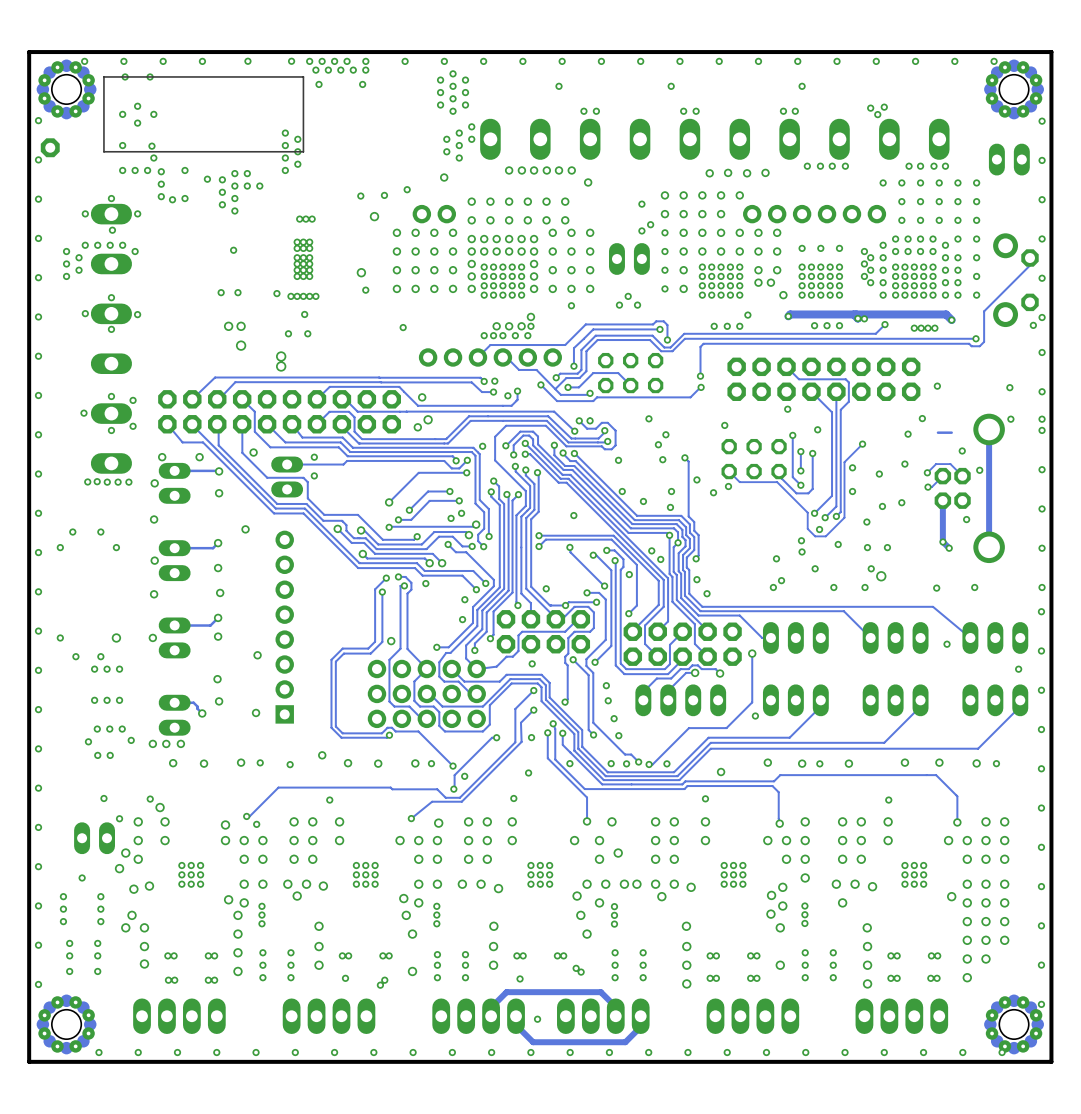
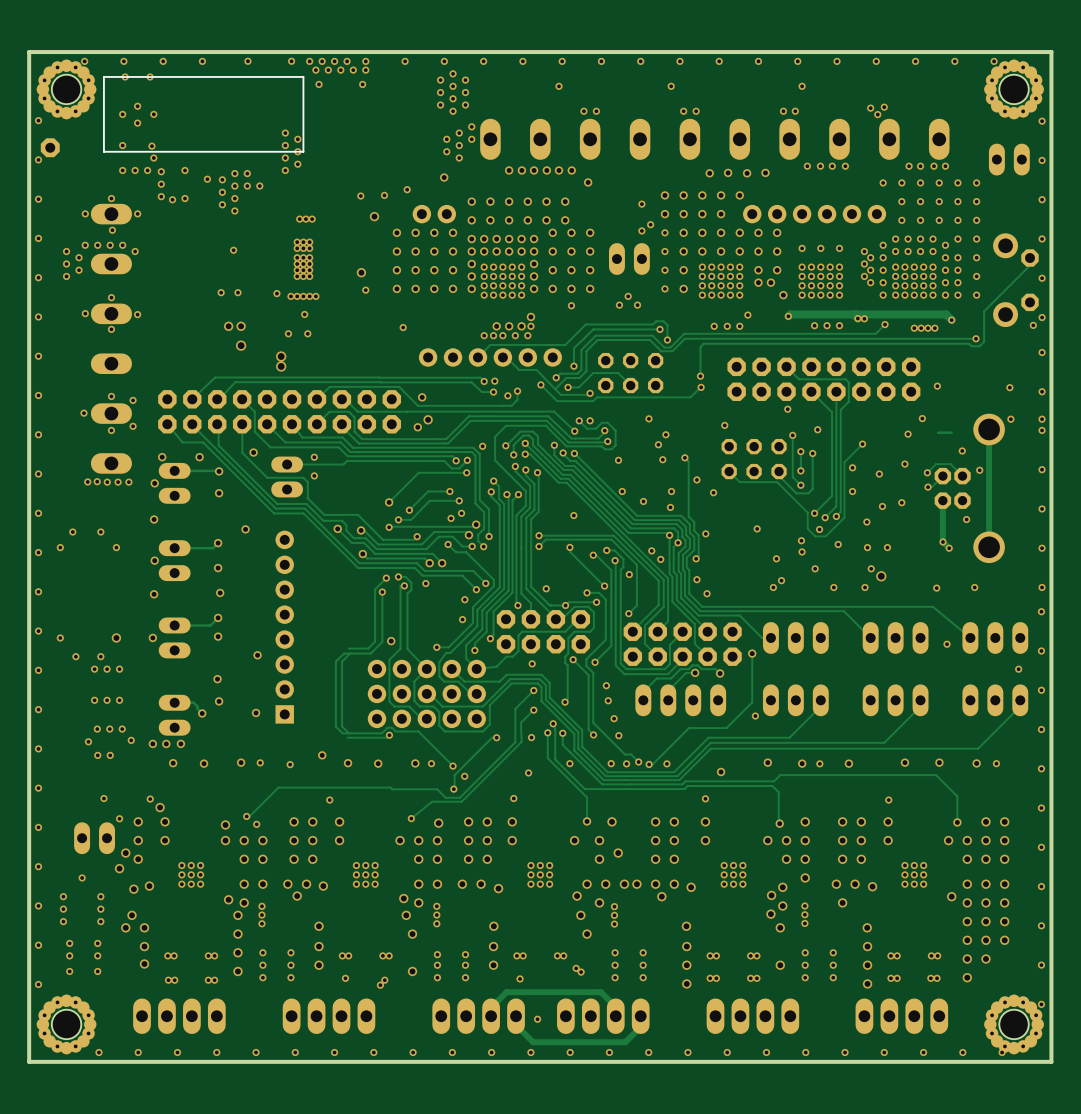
via: (728, 486) -> none
via: none -> (757, 528)
via: none -> (705, 533)
track: (348, 648) (342, 648) (331, 659) (331, 727) (341, 737) (347, 737) -> none
track: none -> (350, 653) (342, 661) (342, 726) (348, 733)

